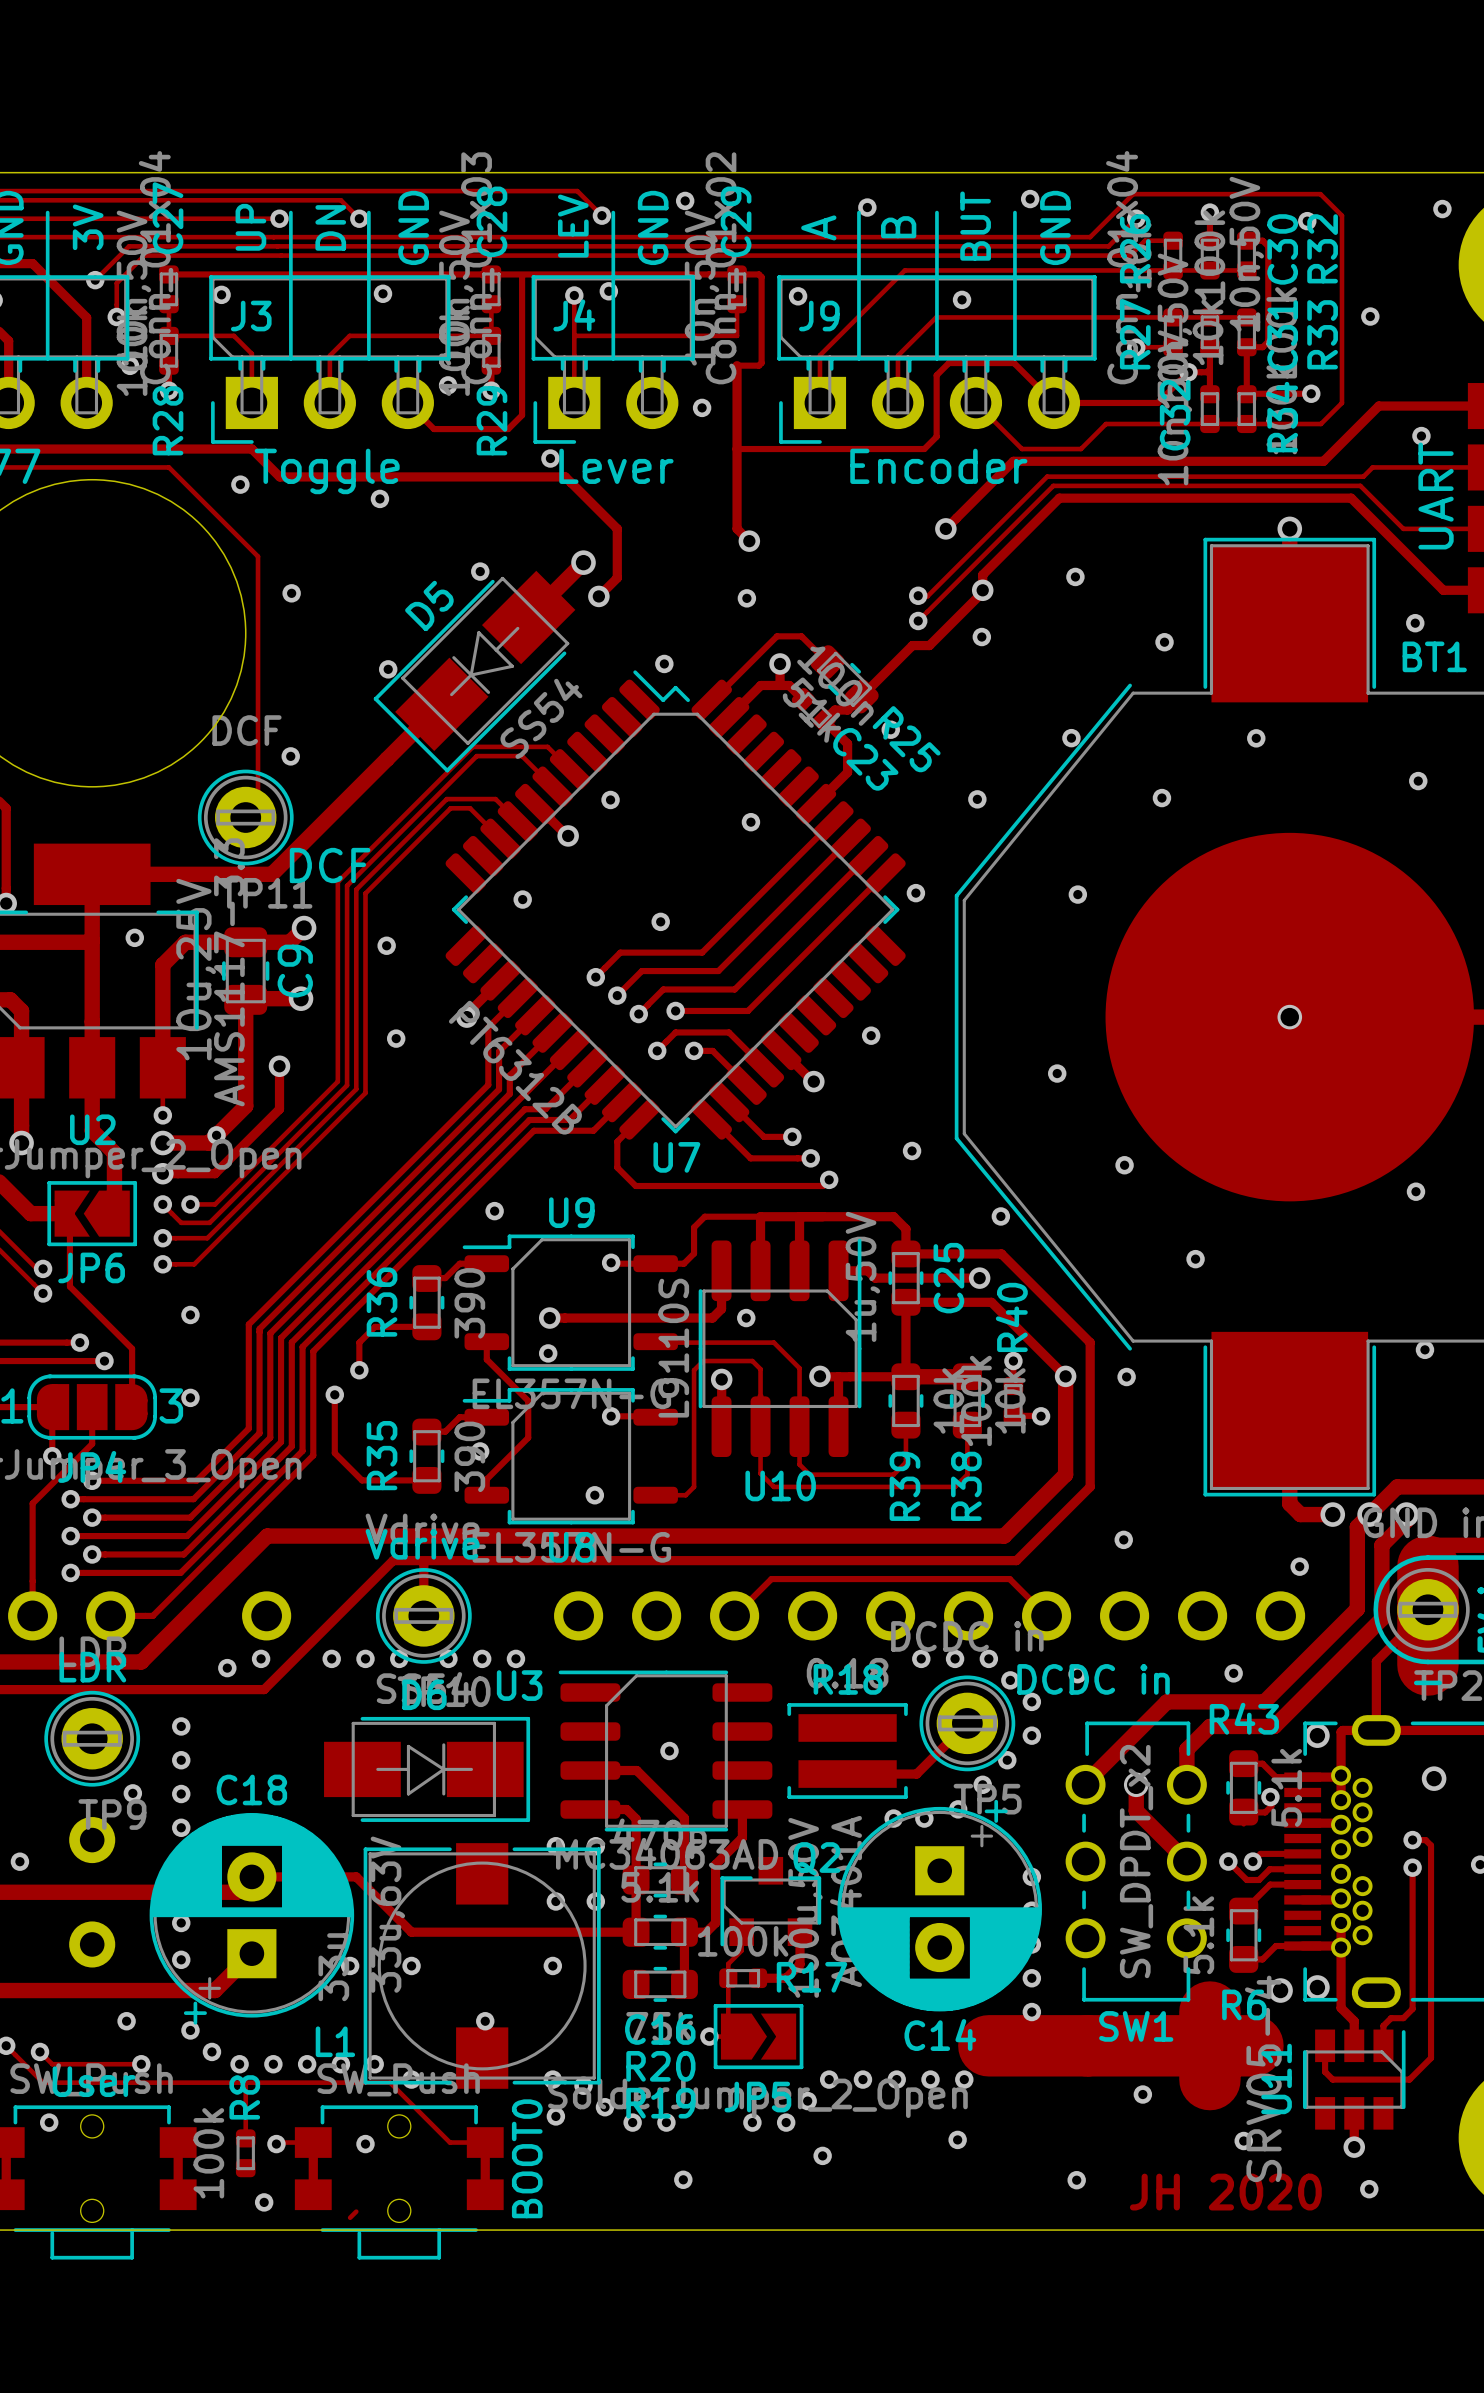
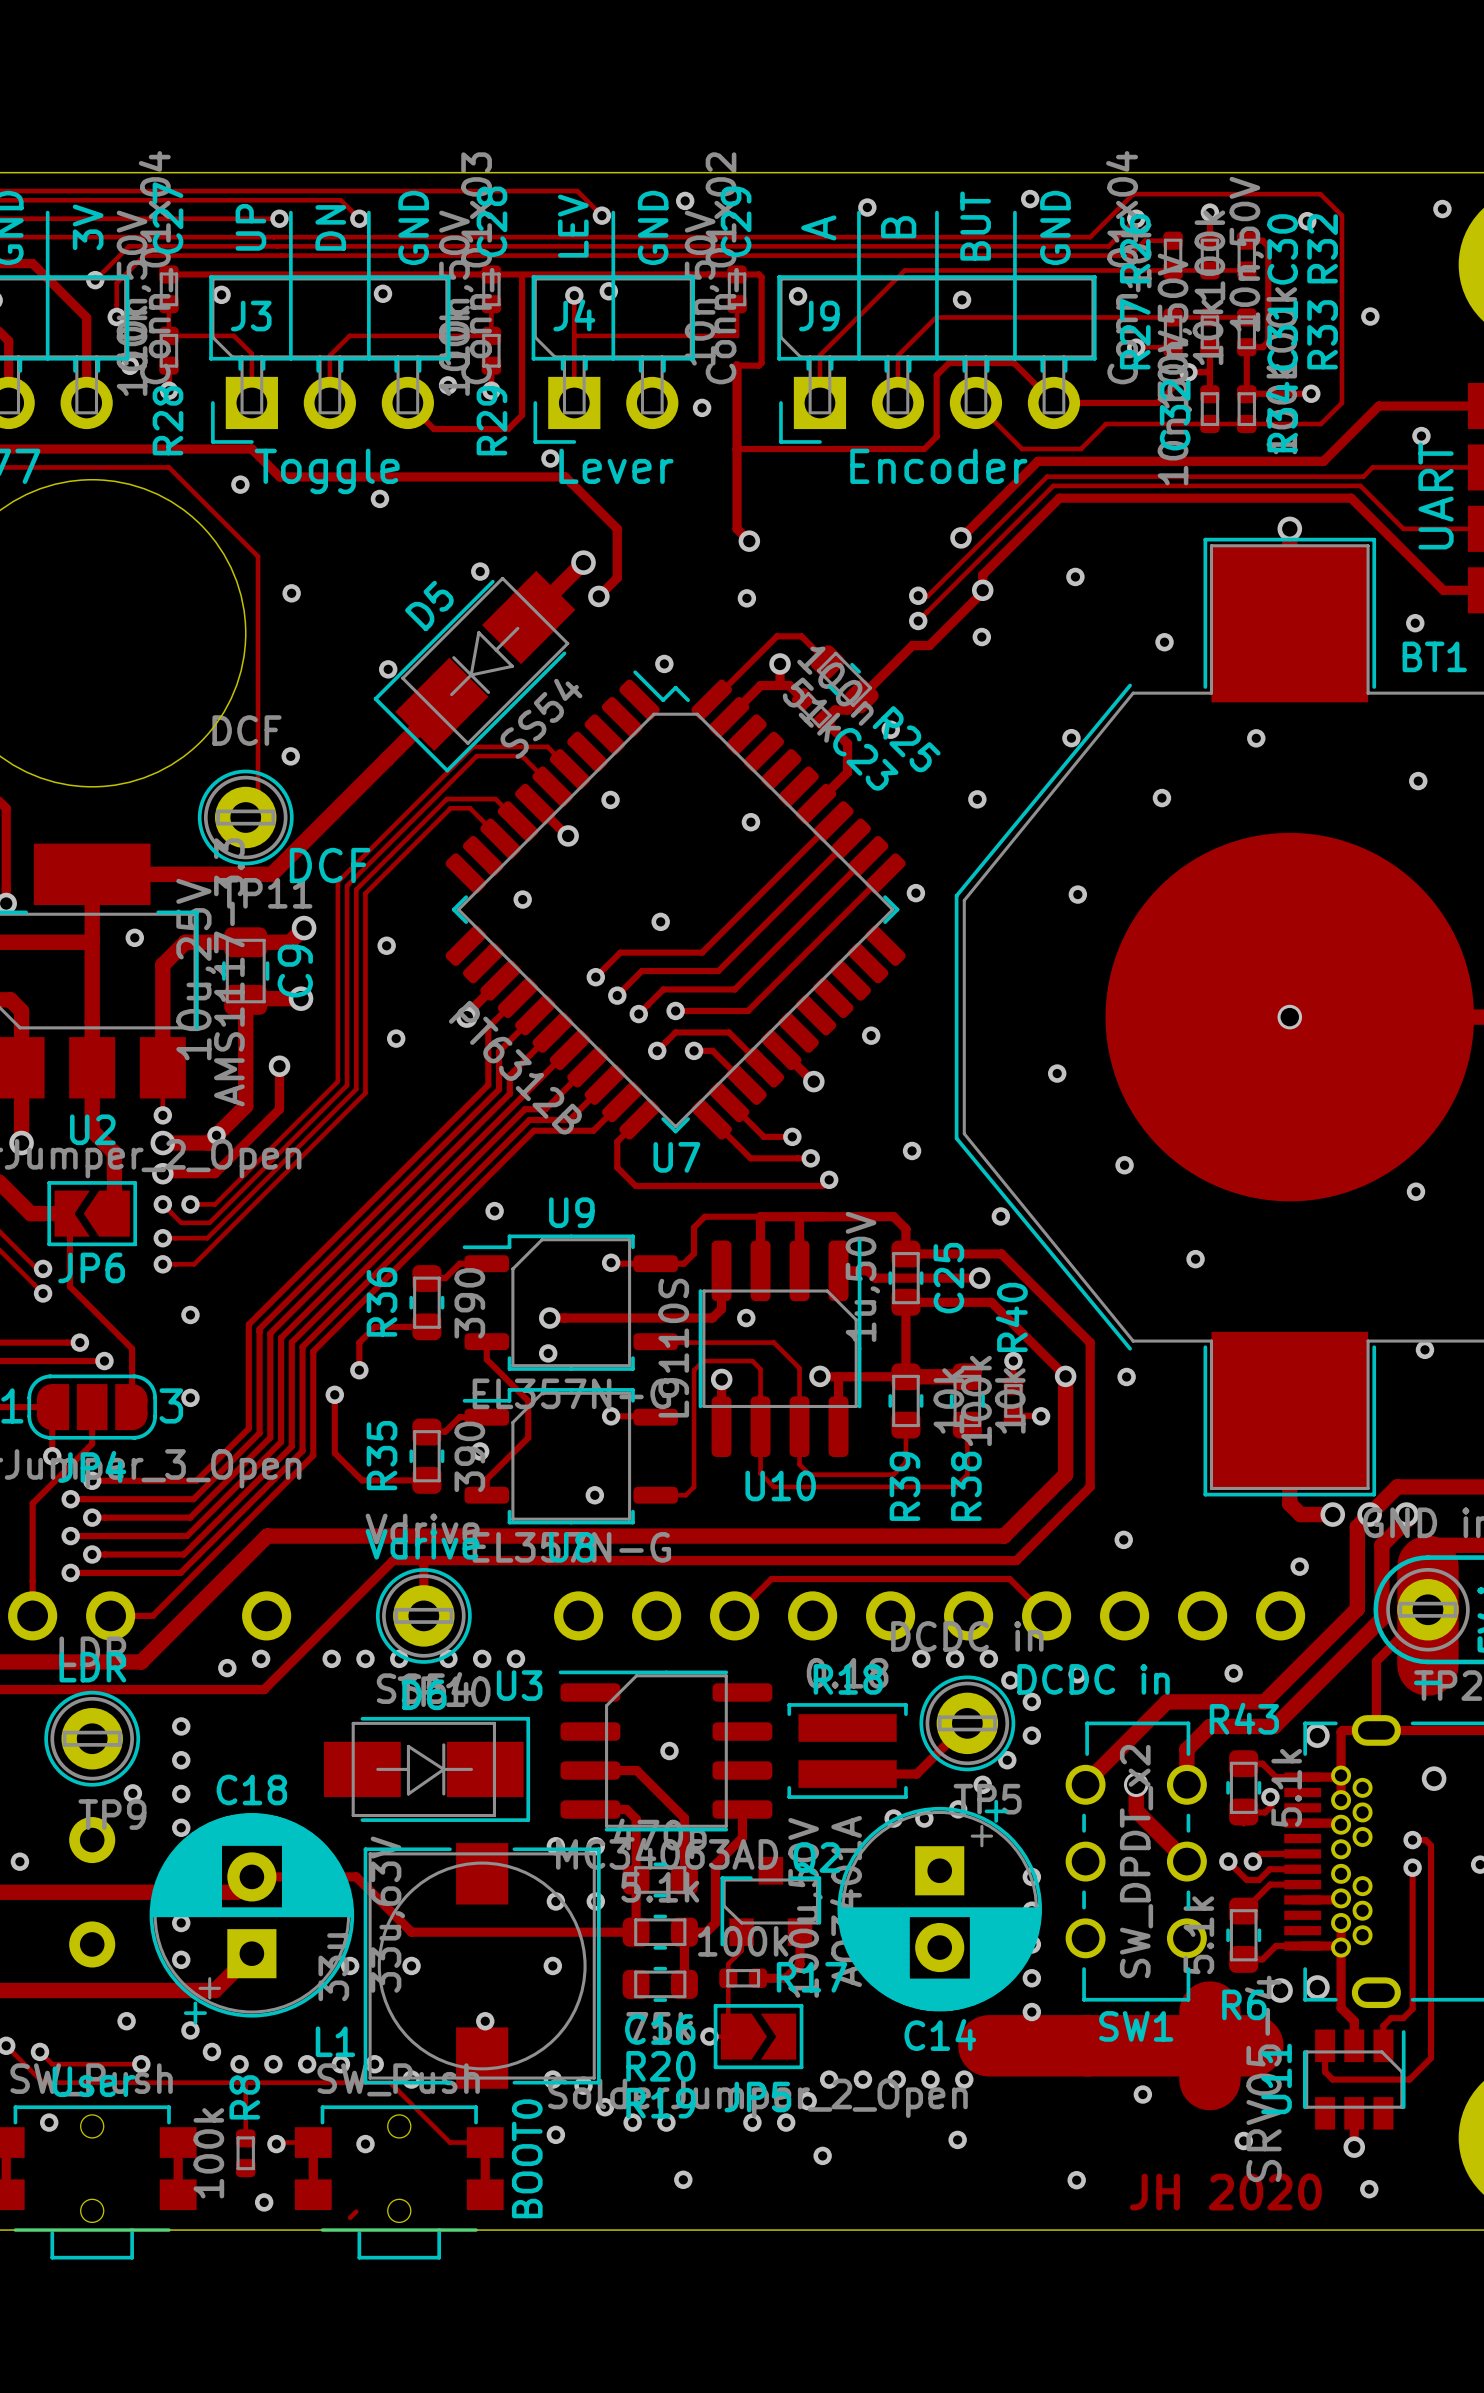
track: (1037, 461) (1013, 461) (945, 528) -> (1037, 461) (961, 538)
via position: (945, 528) -> (961, 537)
via position: (555, 2116) -> (555, 2134)

